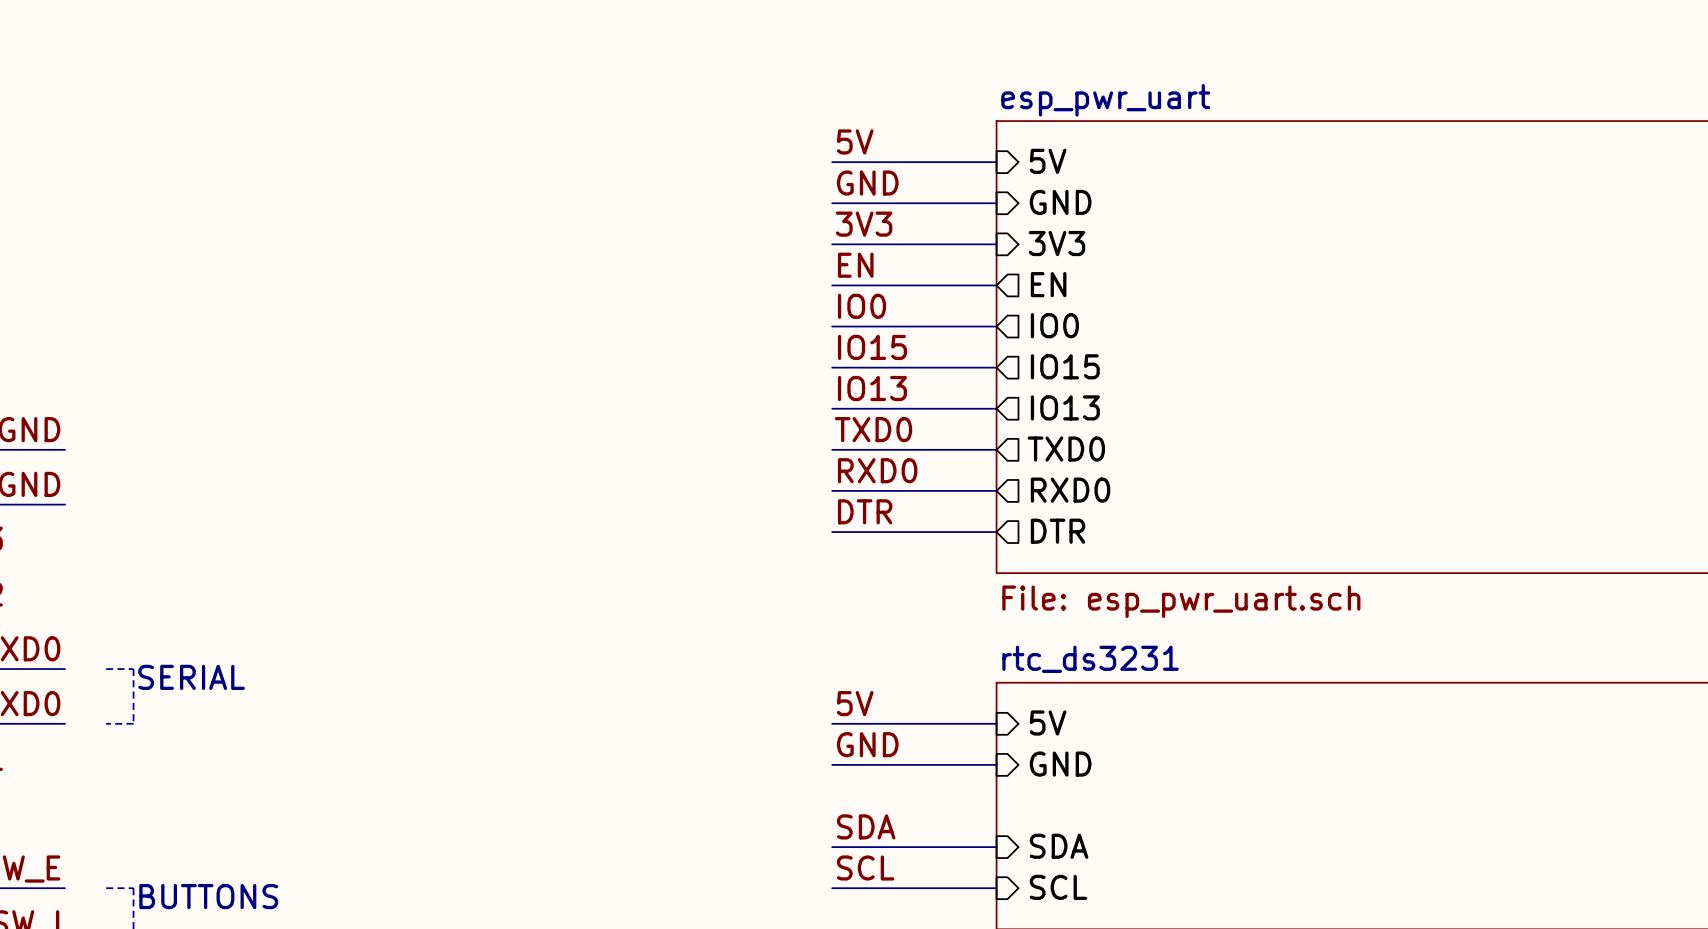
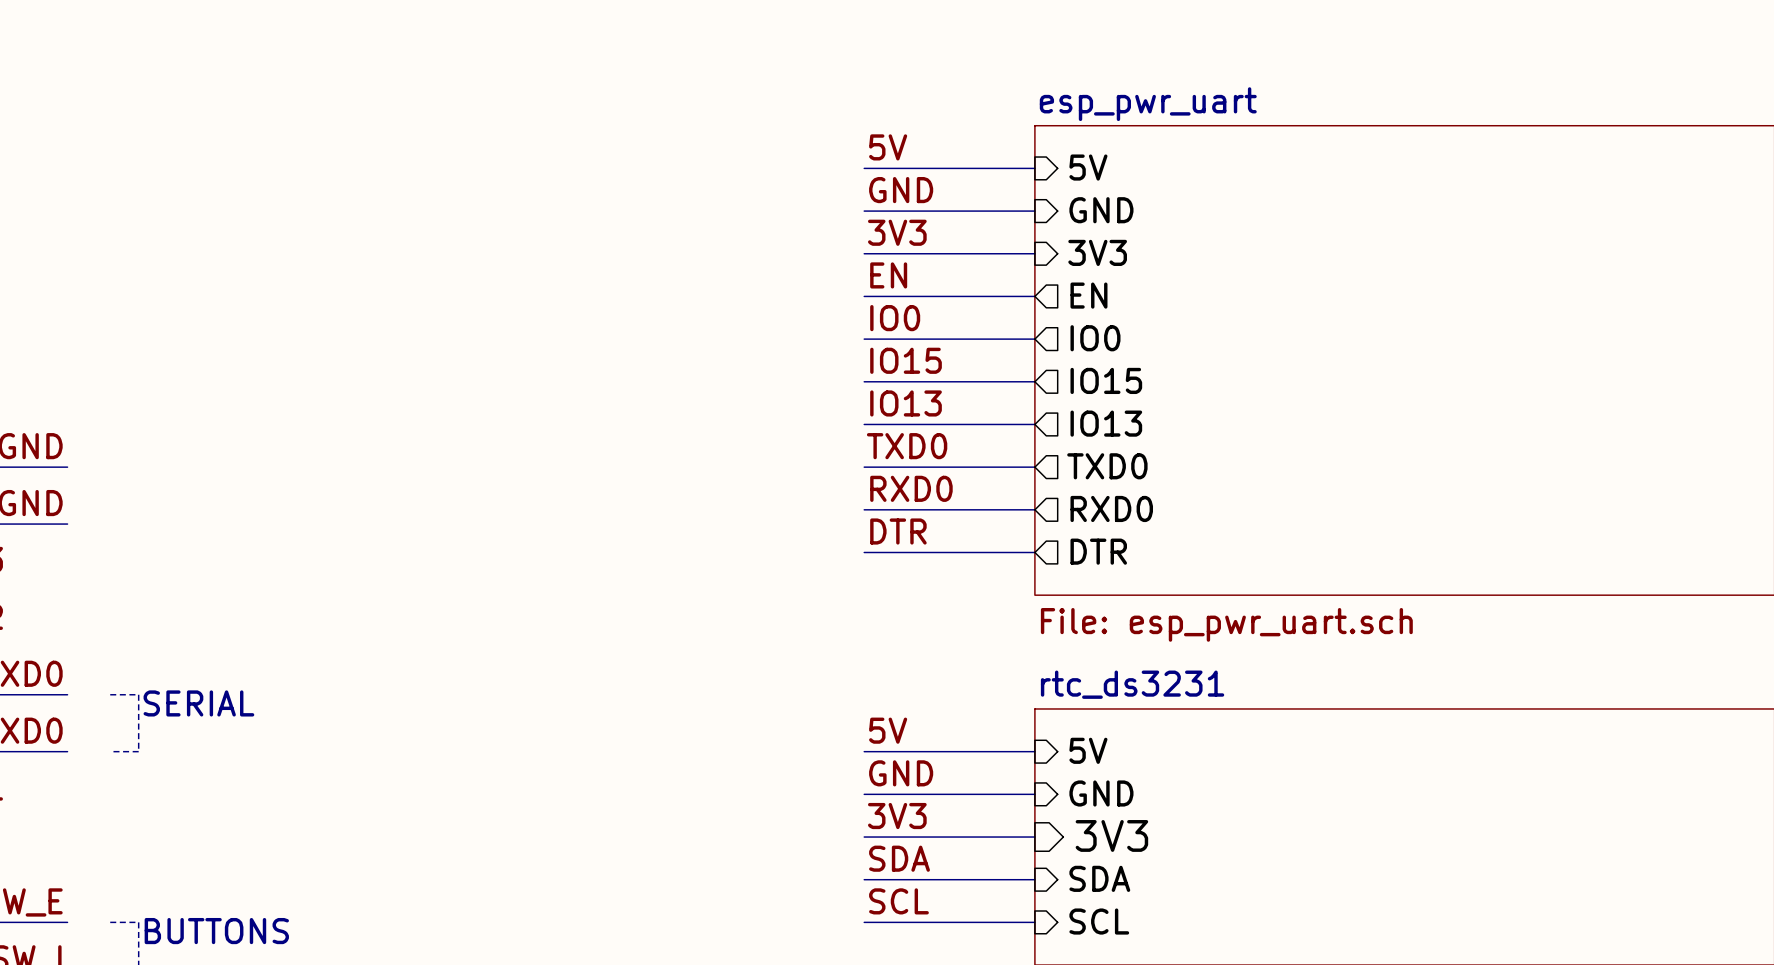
label: none -> 3V3 (897, 816)
sheet pin: none -> 3V3 (1111, 835)
wire: none -> (864, 837) (1034, 837)

